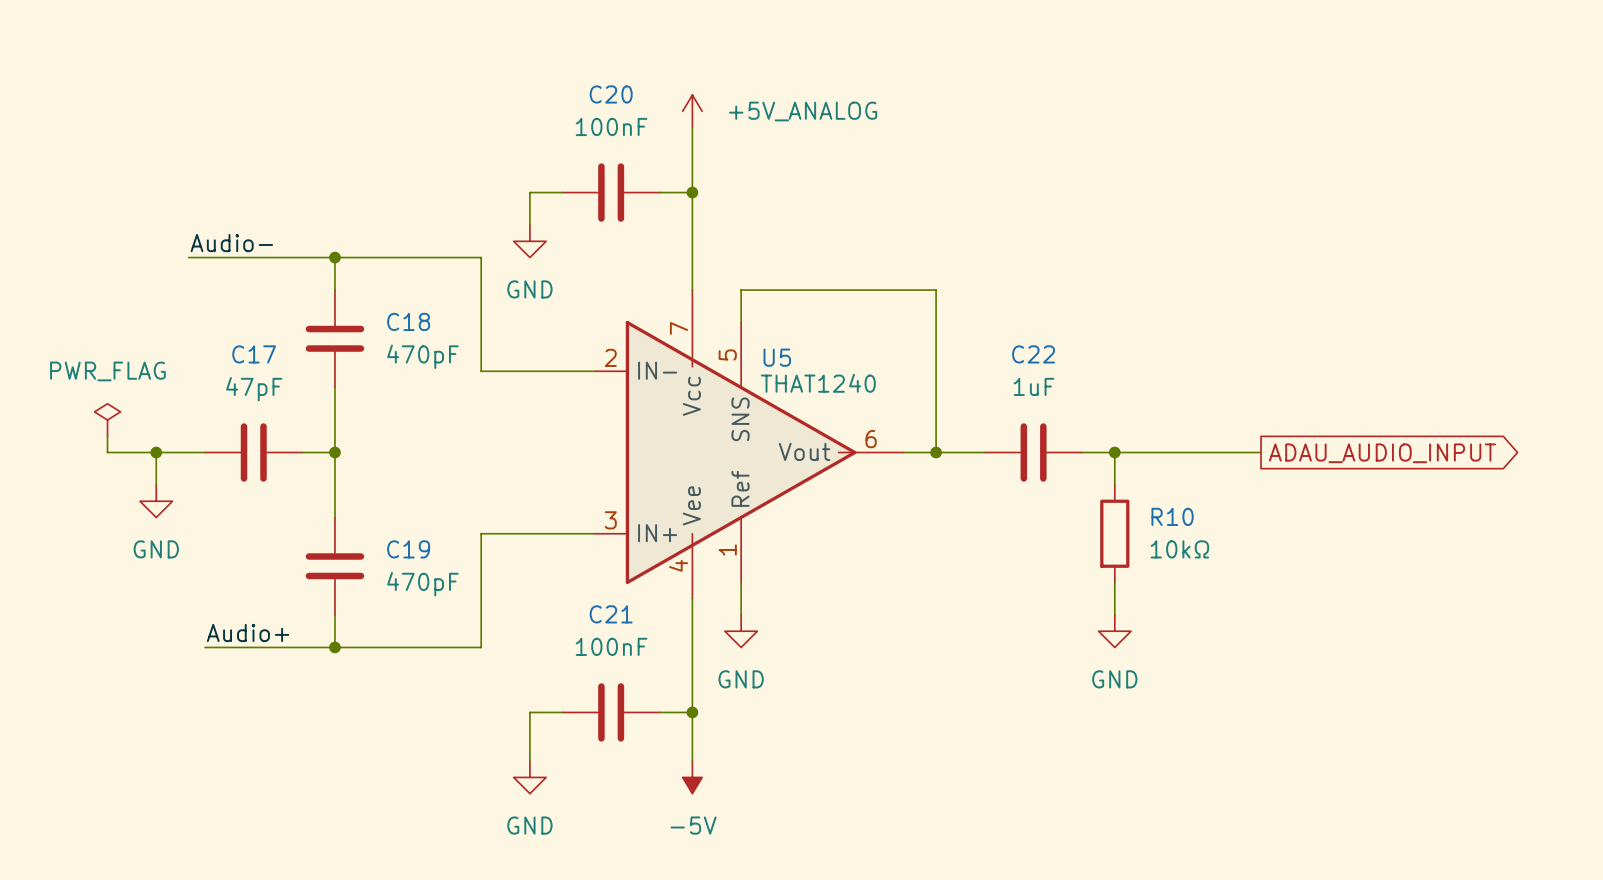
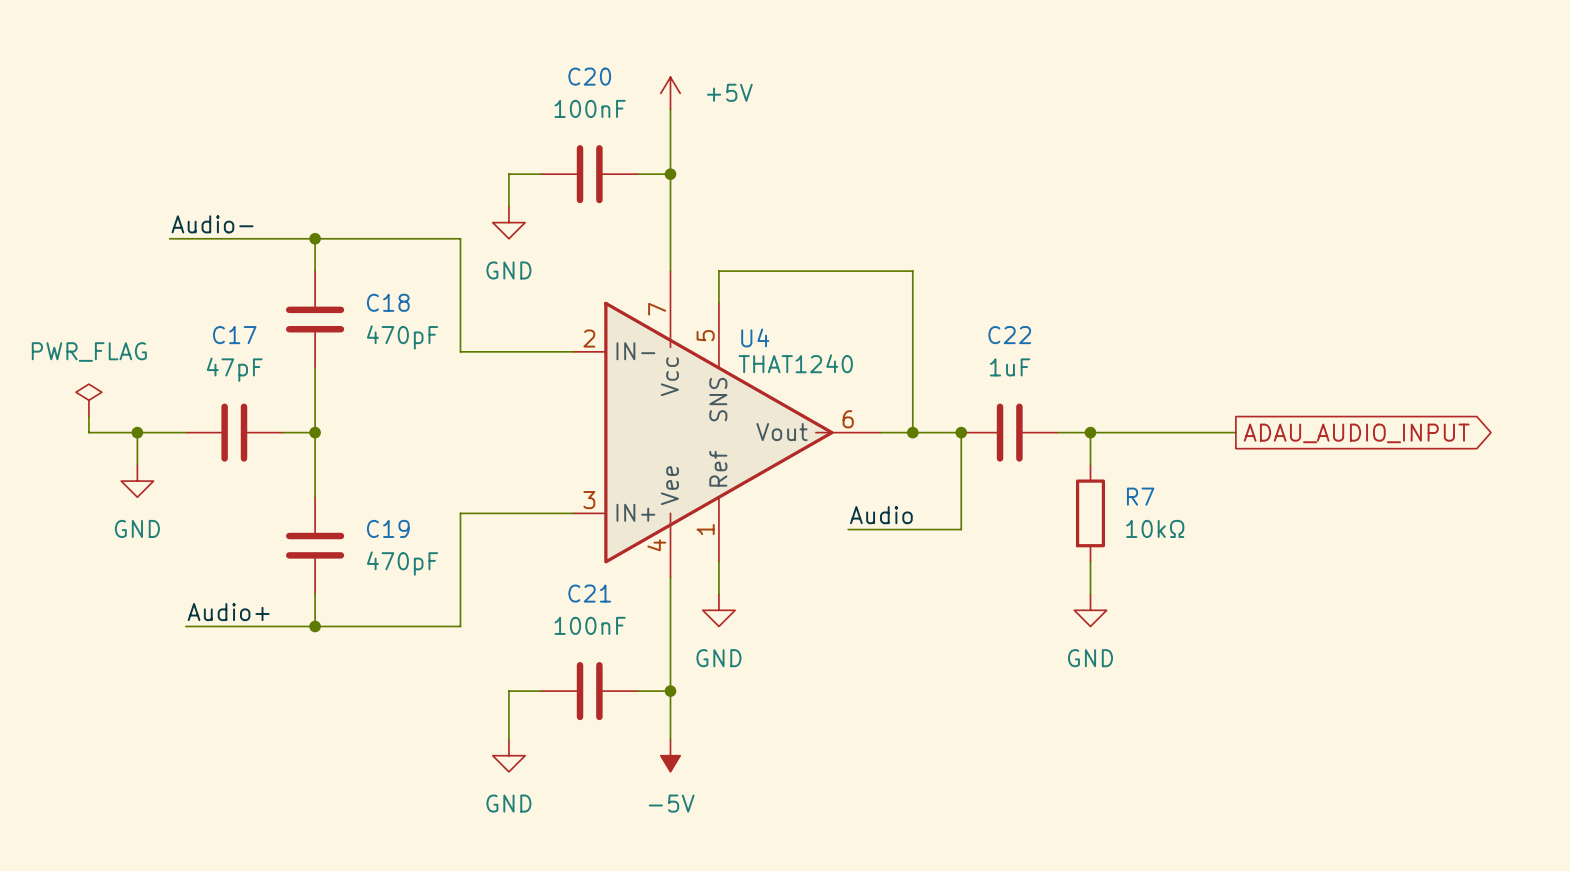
power symbol: +5V_ANALOG (692, 111) -> +5V (670, 93)
U5 name: U5 (777, 357) -> U4 (755, 337)
wire: none -> (961, 432) (961, 529) (848, 529)
junction: none -> (961, 432)
R10 name: R10 (1172, 516) -> R7 (1140, 496)
label: none -> Audio (881, 515)

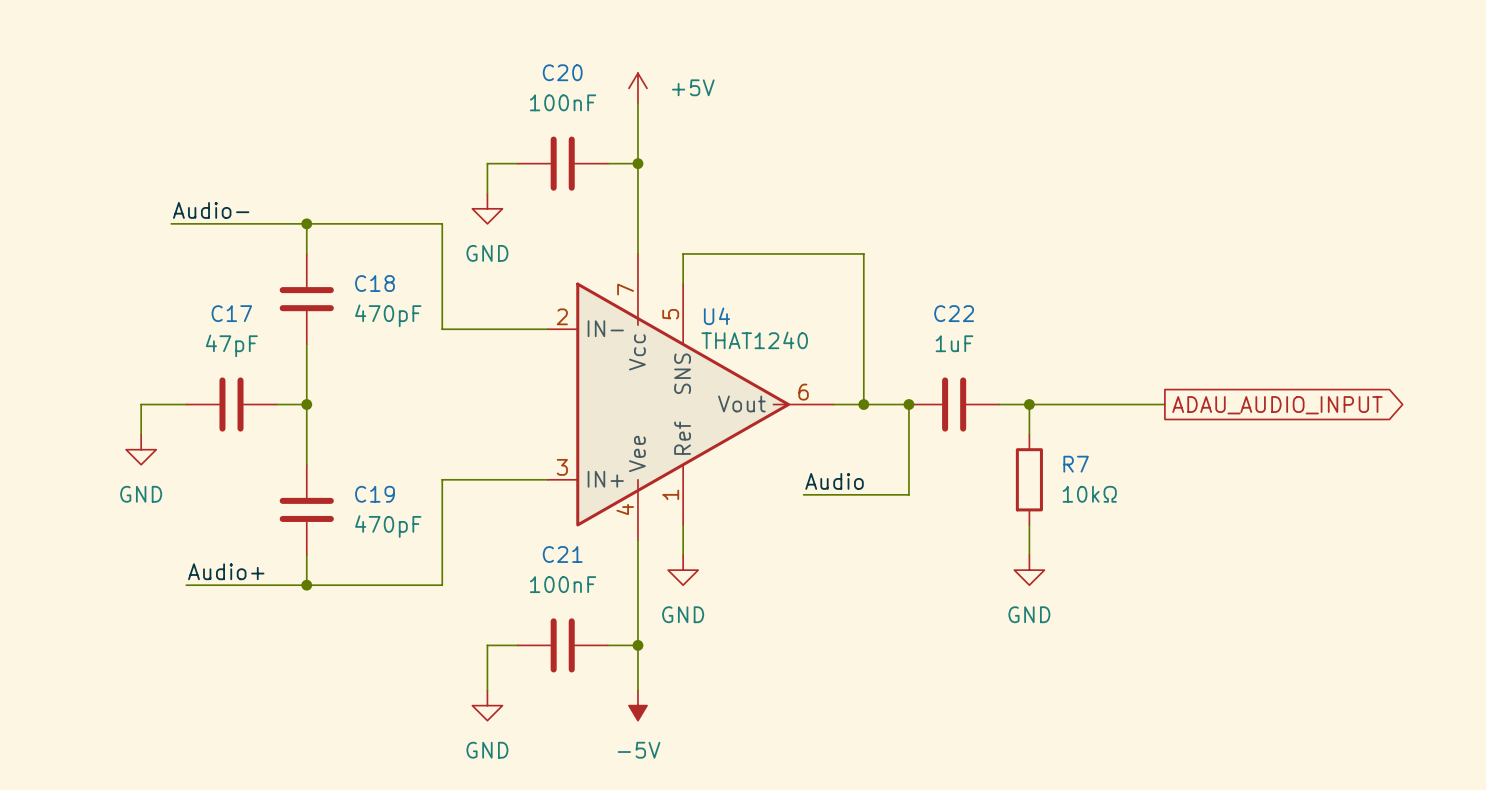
power symbol: PWR_FLAG (88, 400) -> none
wire: (88, 416) (88, 432) (137, 432) -> none
junction: (137, 432) -> none

